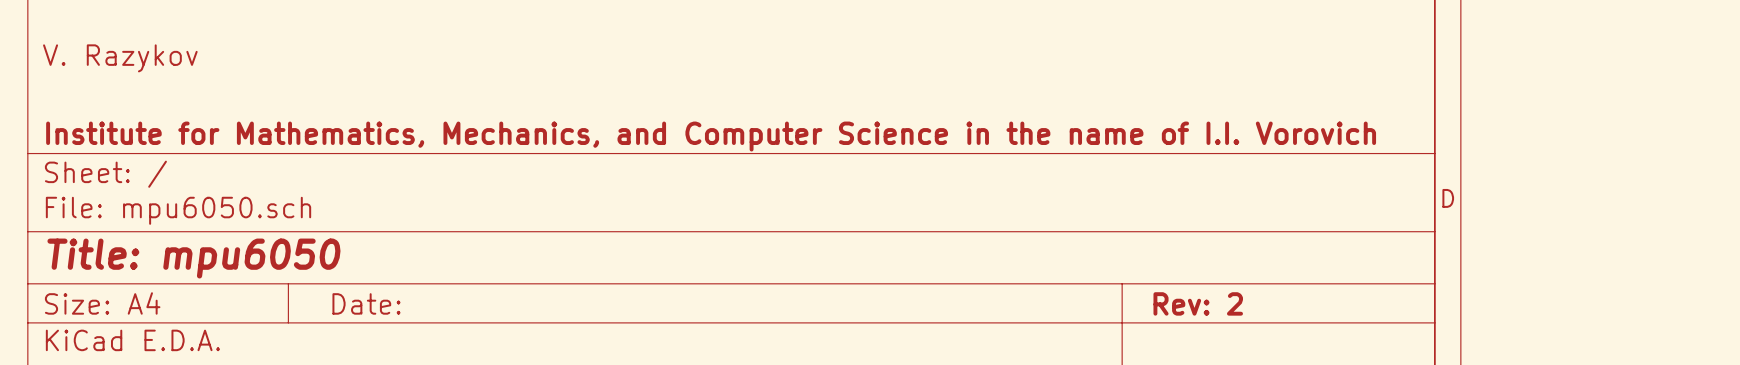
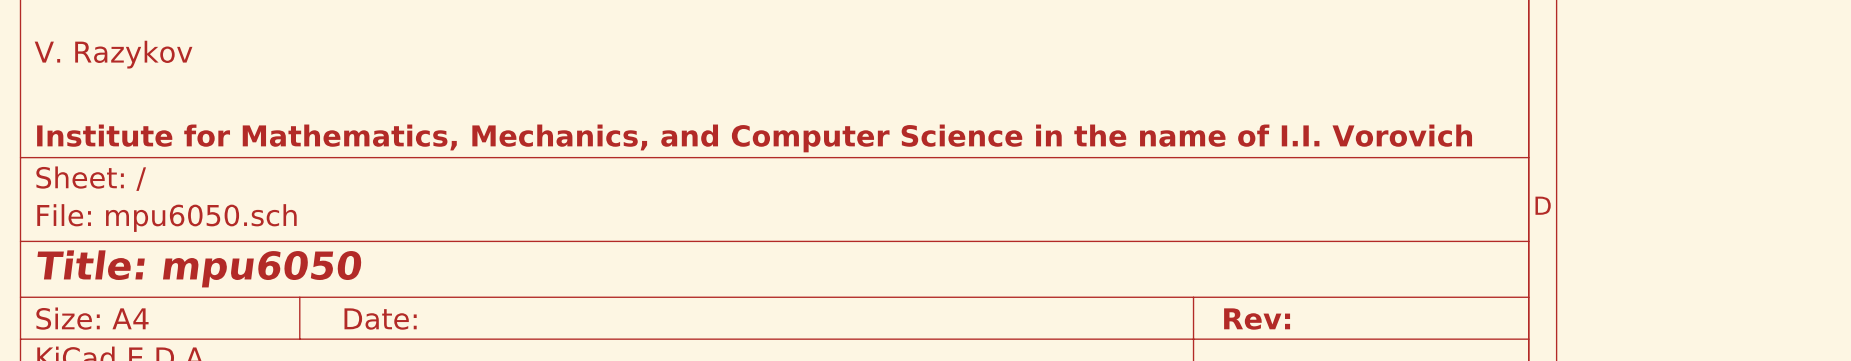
title block: Rev: 2 (1198, 303) -> Rev: (1257, 319)

